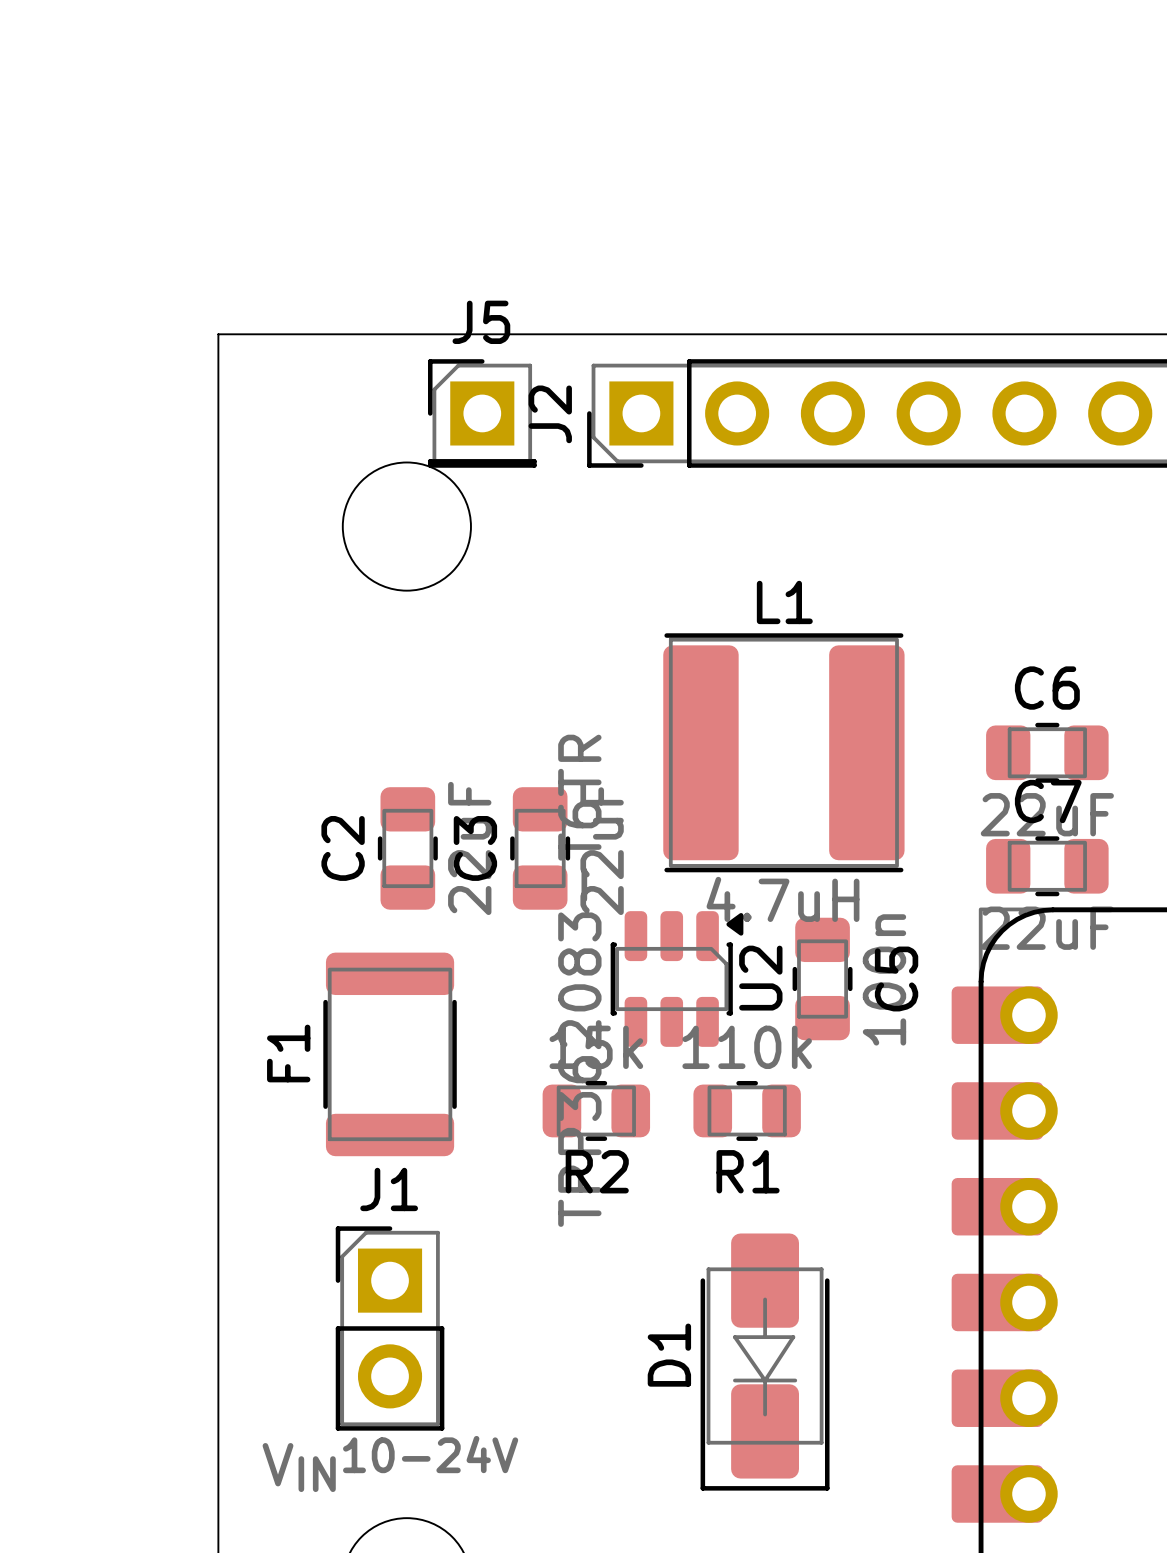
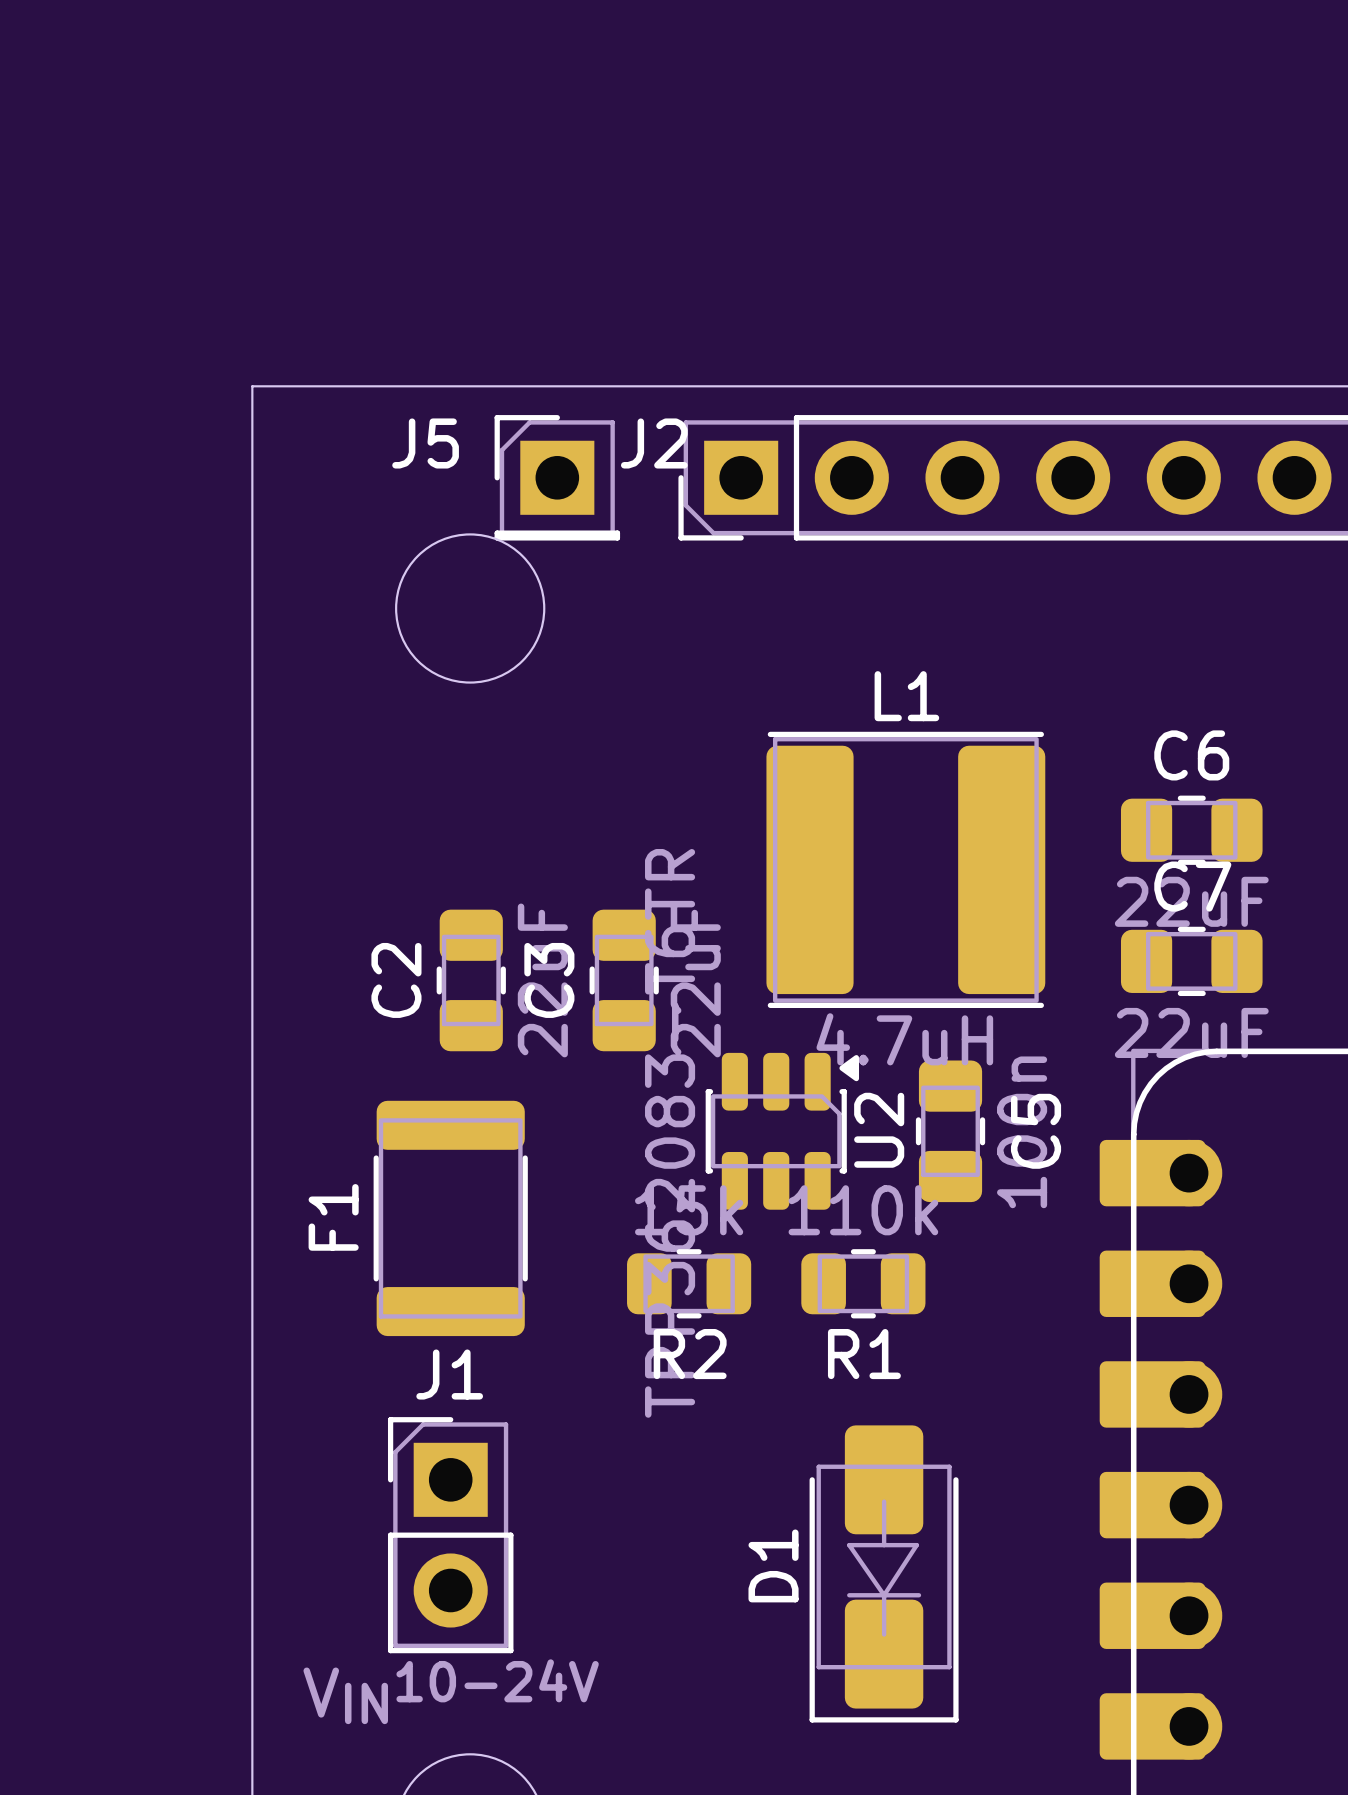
J5 name position: J5 (481, 322) -> J5 (425, 443)
J2 name rotation: 0° (550, 414) -> 90° clockwise (654, 443)
C6 position: (1047, 752) -> (1191, 830)
C7 position: (1047, 866) -> (1191, 961)

